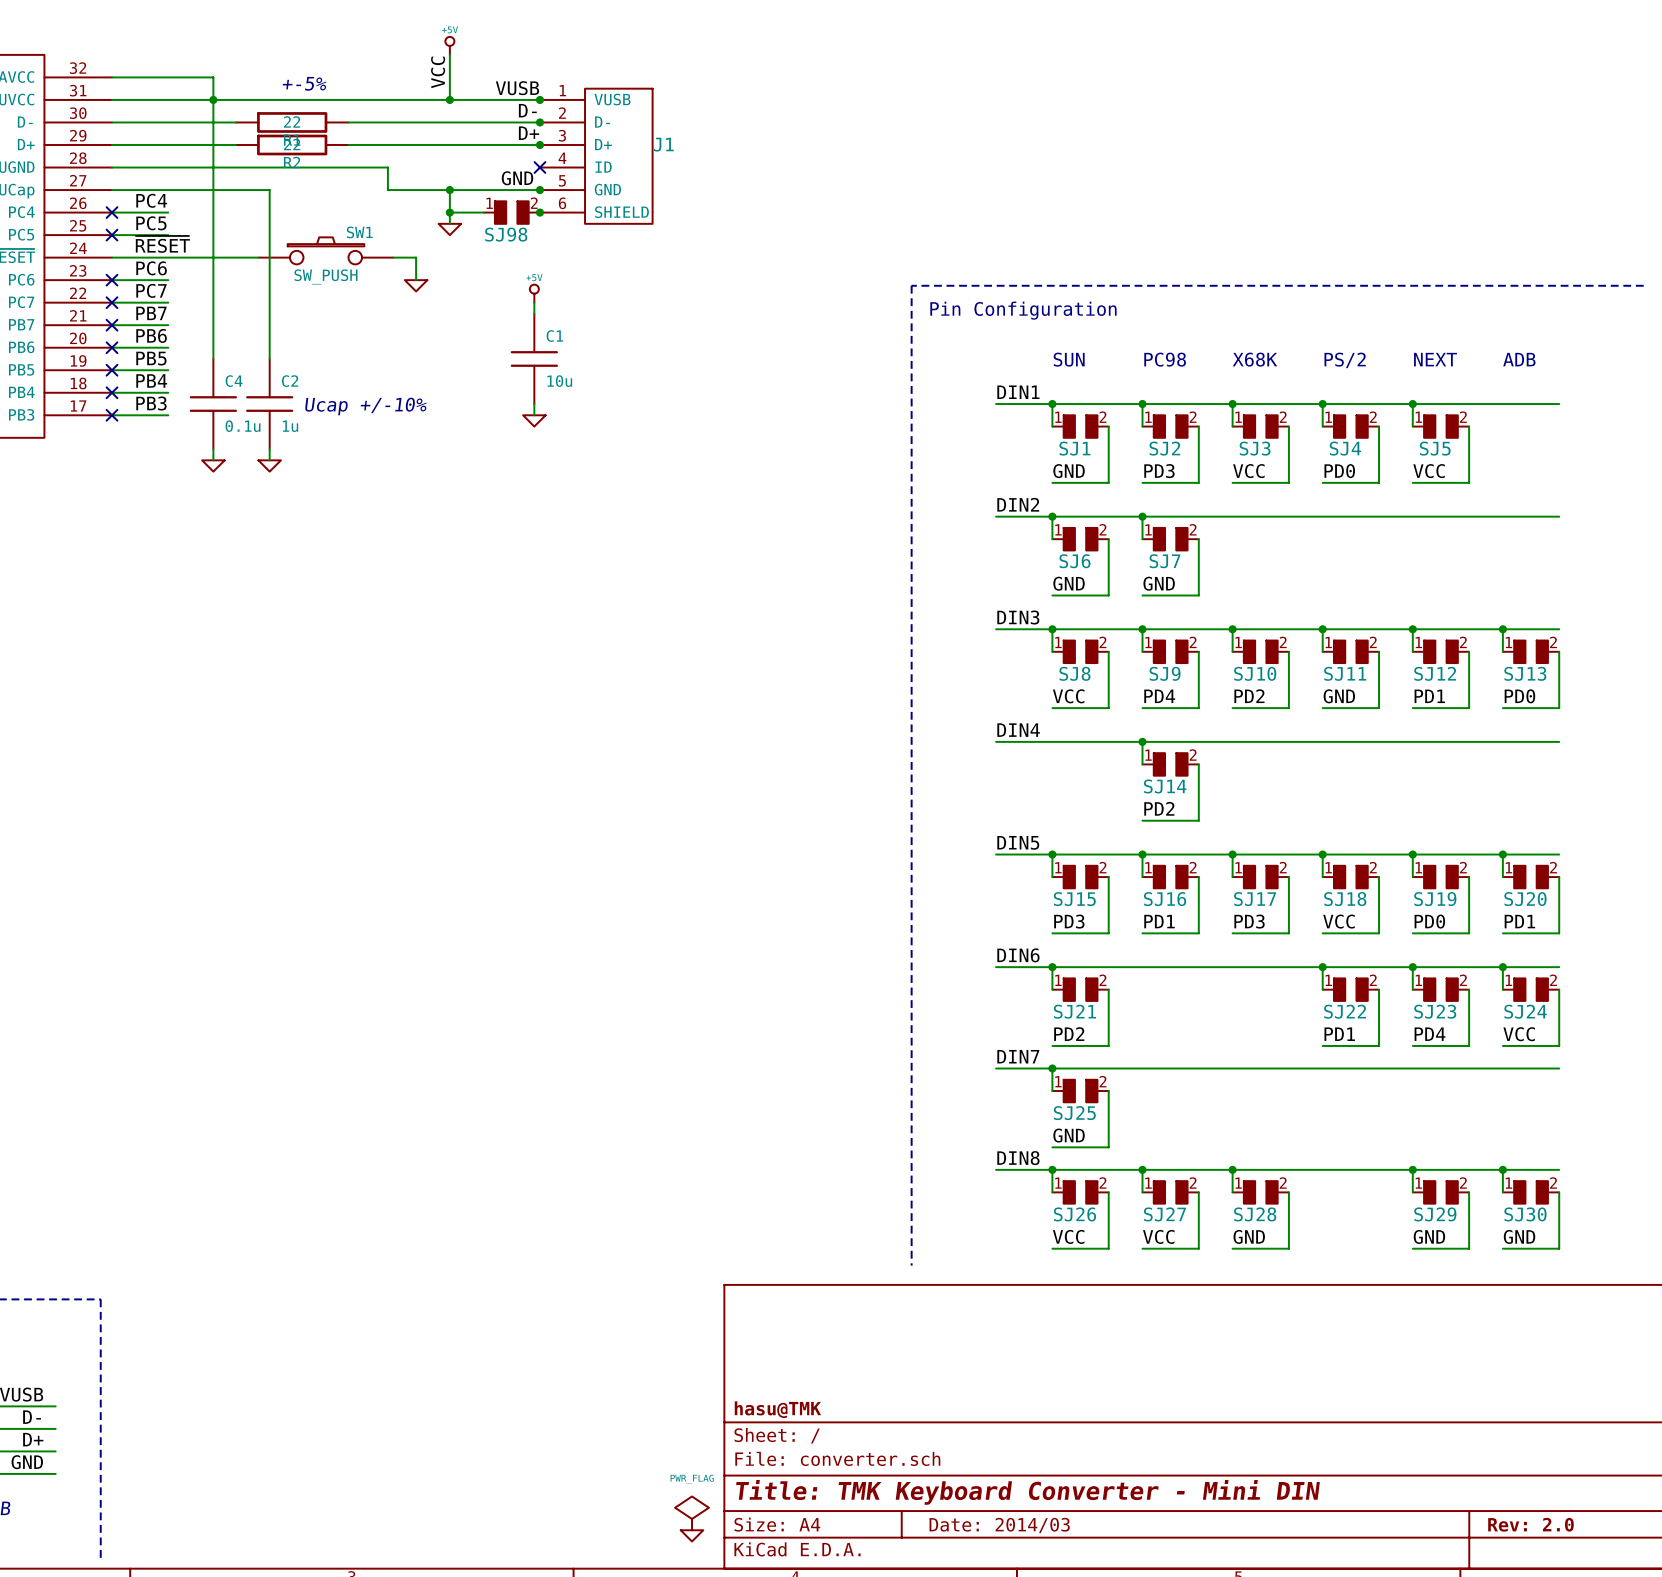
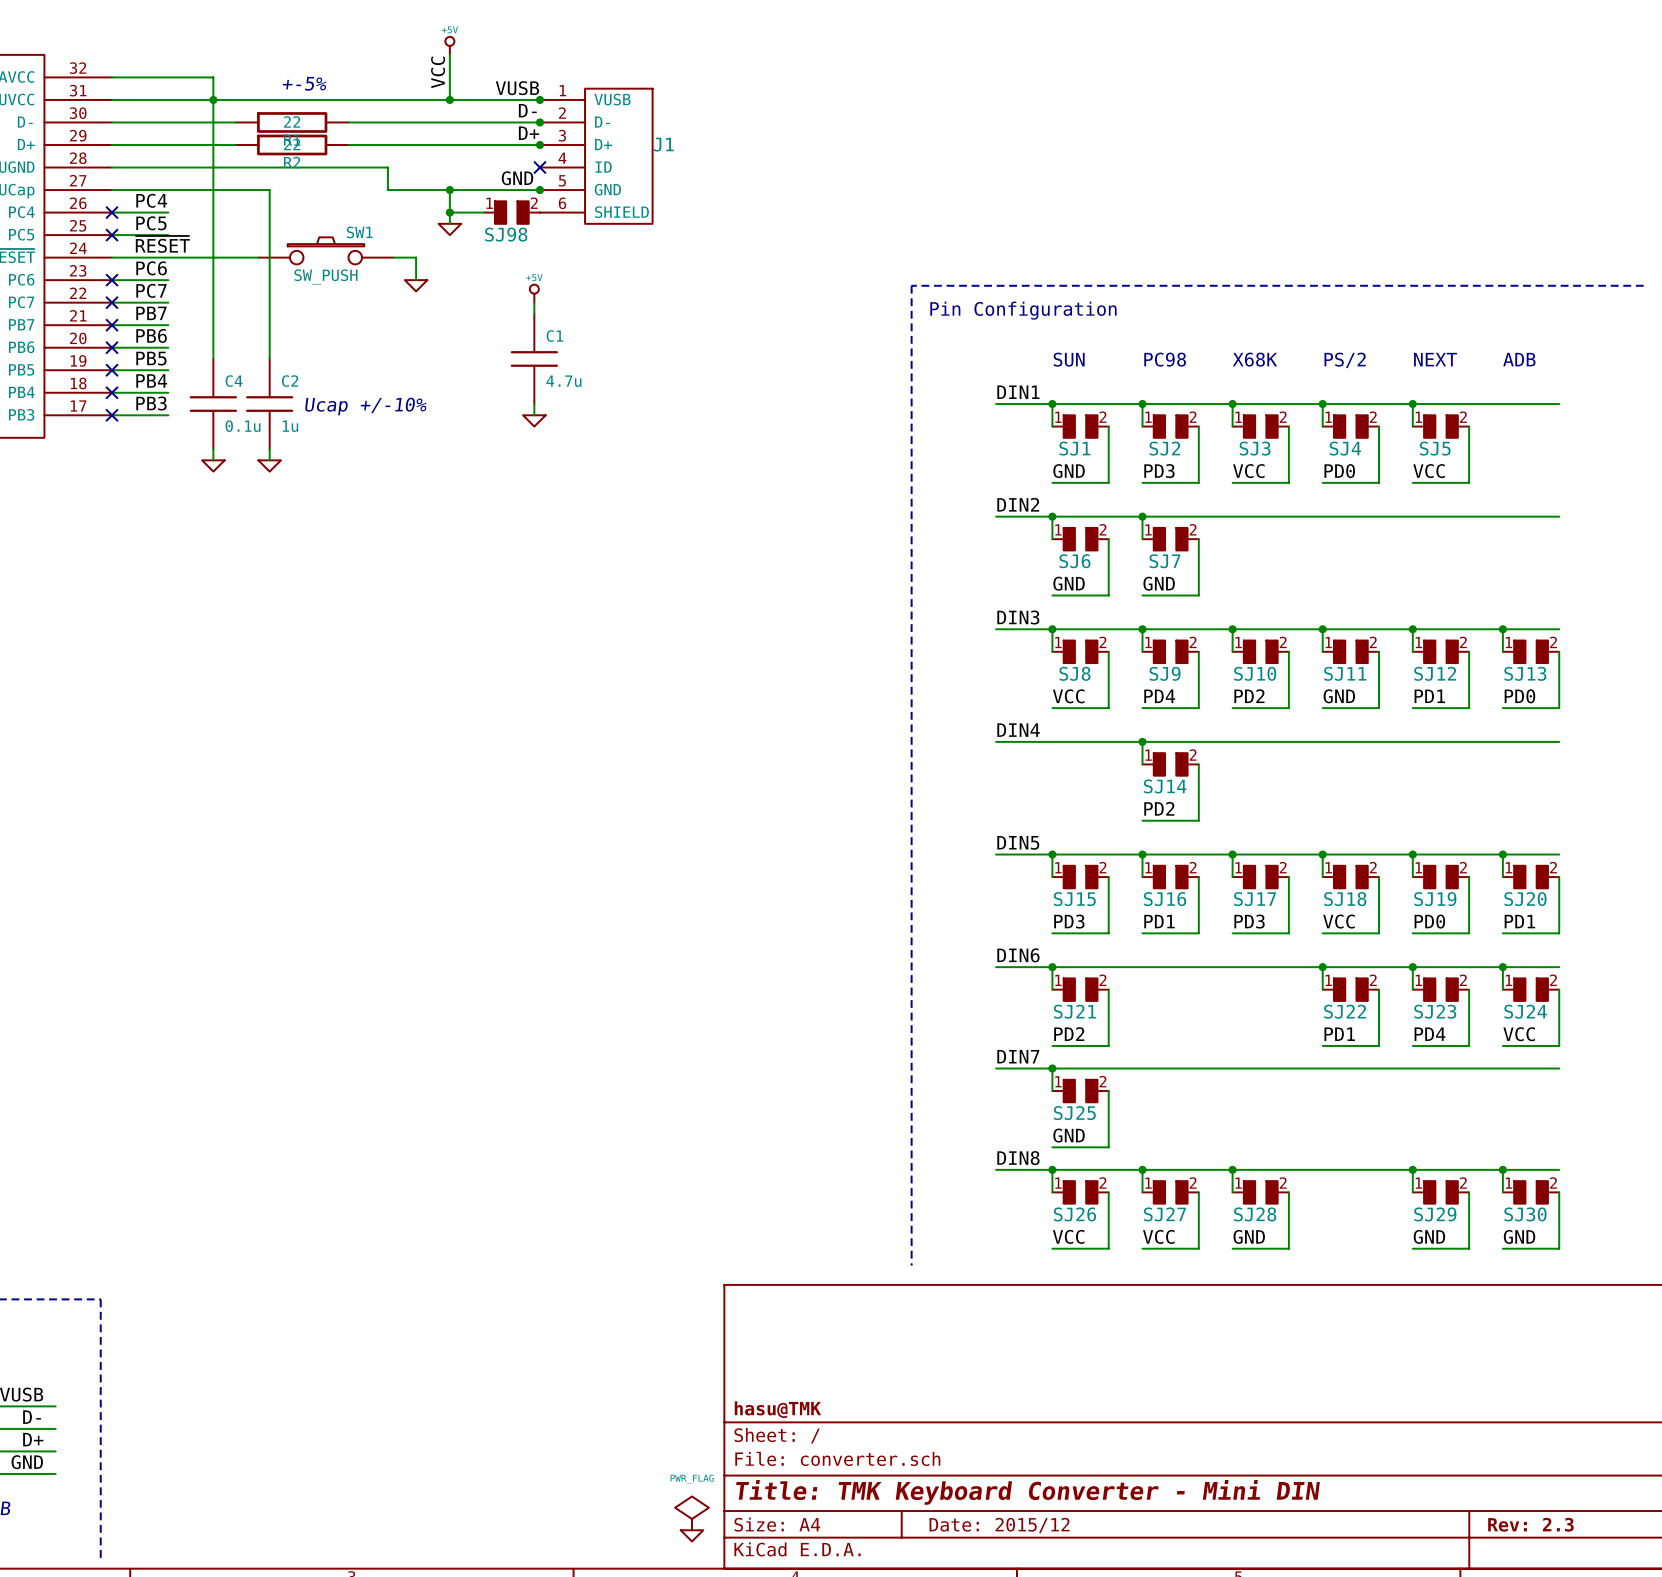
junction: (539, 212) -> none
C1 value: 10u (559, 381) -> 4.7u (563, 381)
title block: Rev: 2.0 (1530, 1524) -> Rev: 2.3 (1530, 1524)
title block: Date: 2014/03 (999, 1525) -> Date: 2015/12 (999, 1525)

